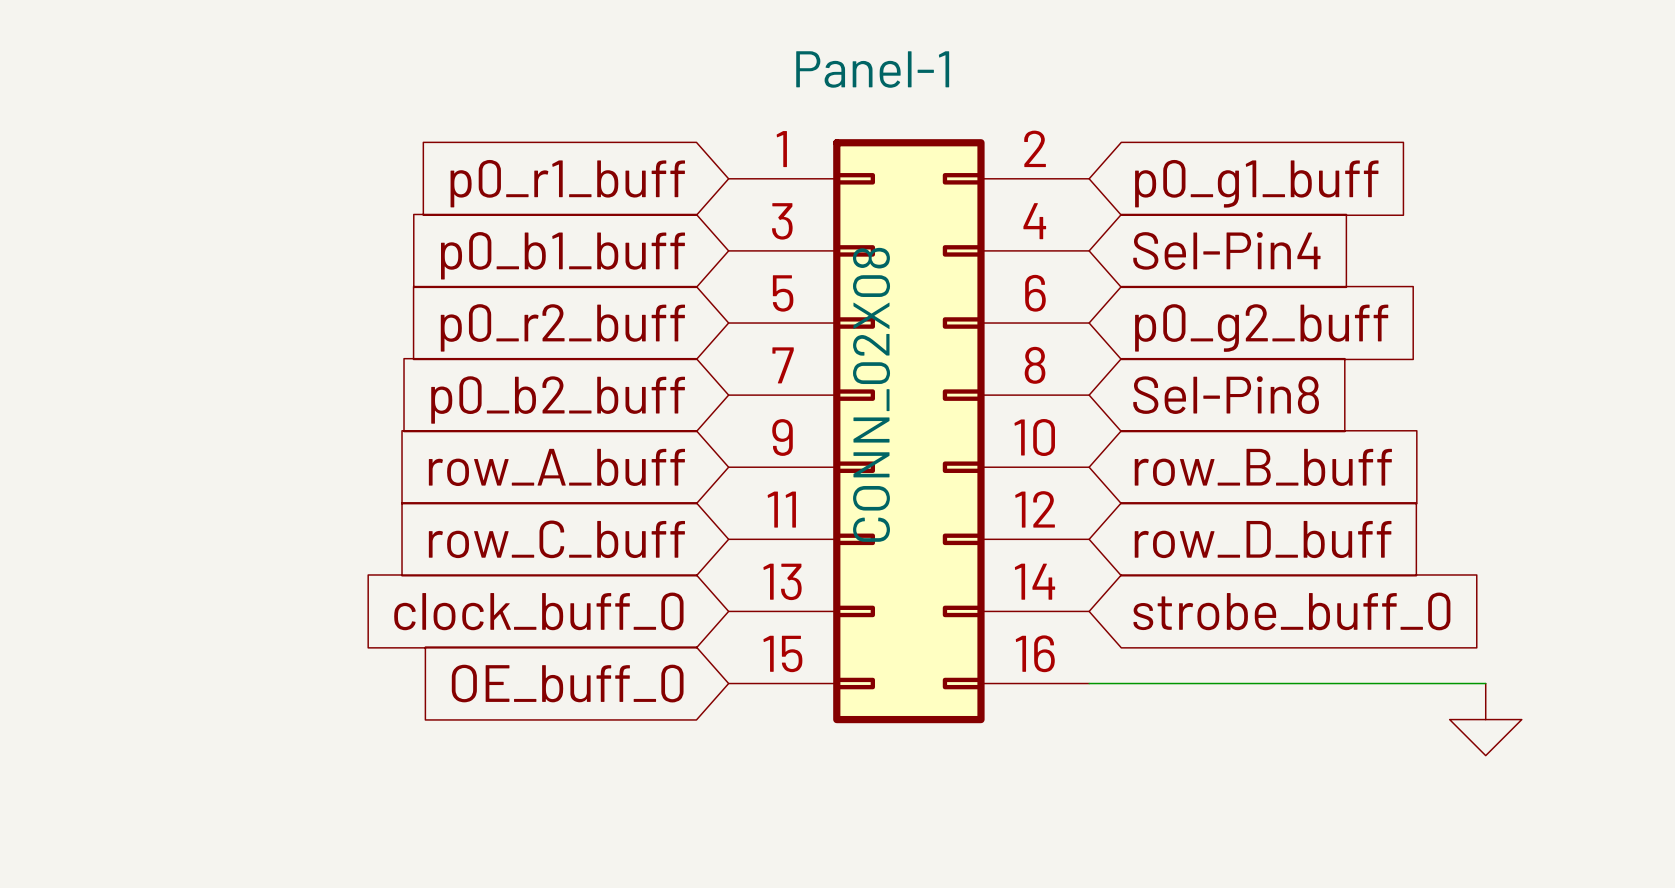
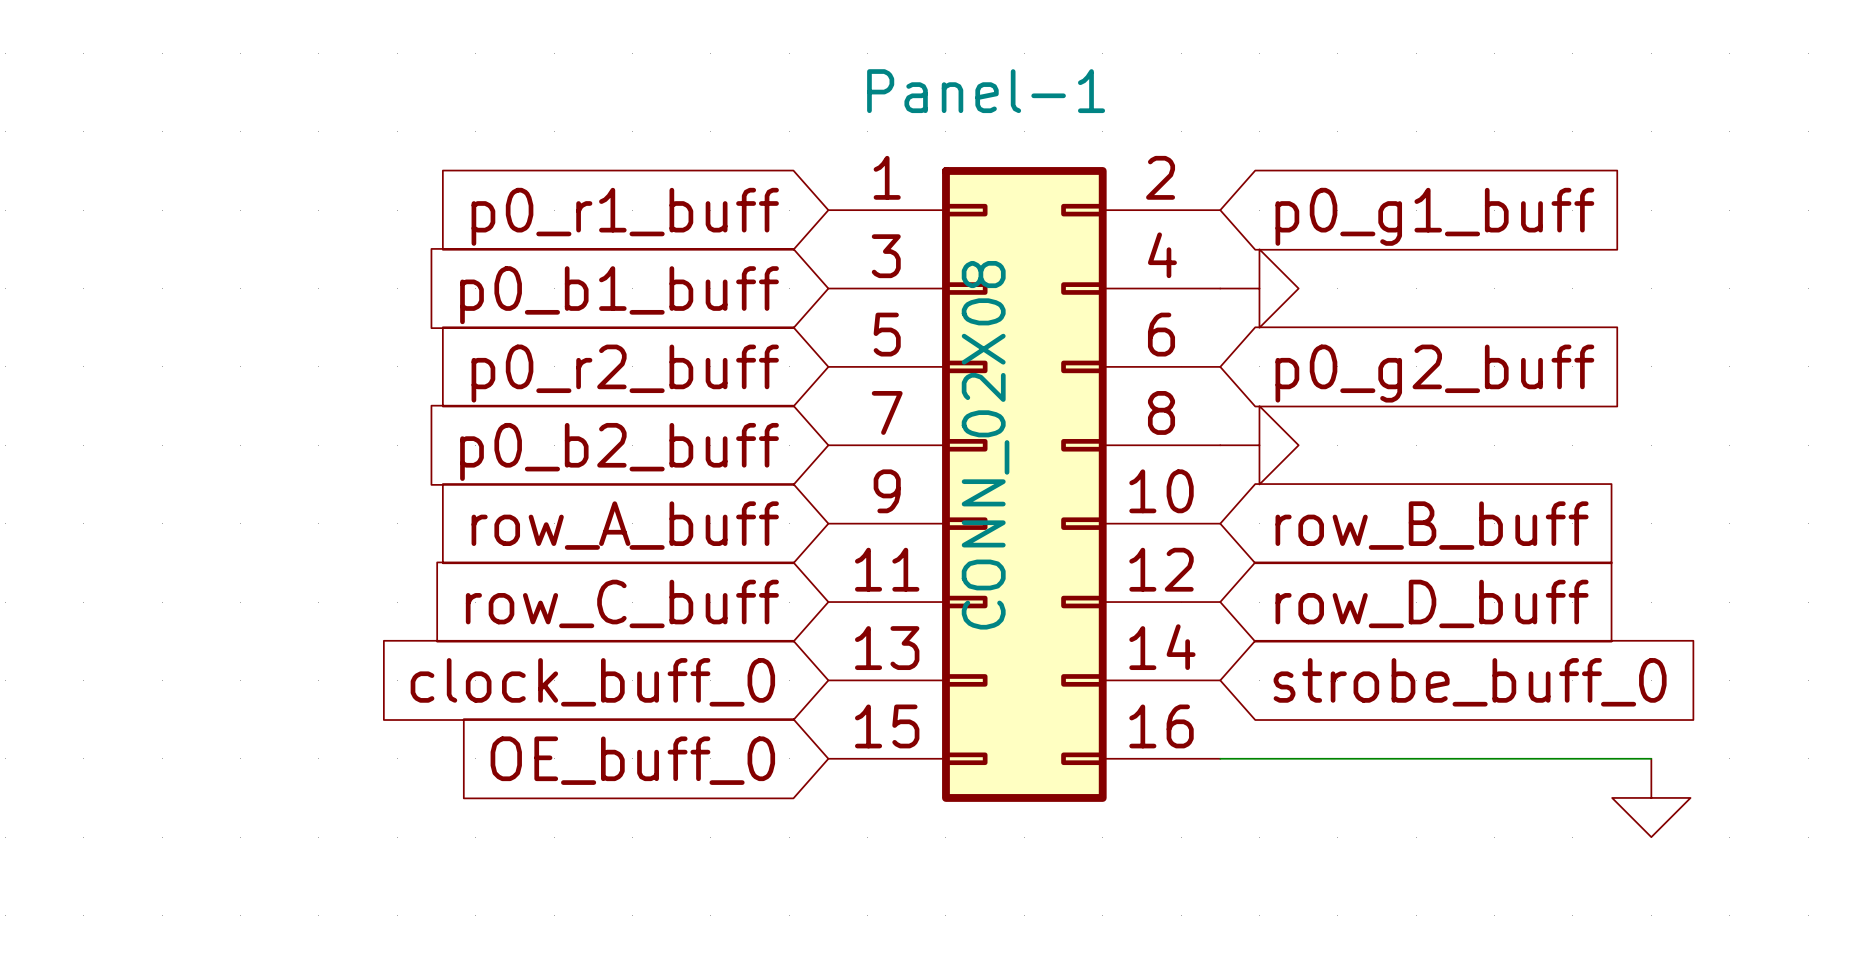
power symbol: none -> (1259, 288)
global label: Sel-Pin4 (1226, 250) -> none
power symbol: none -> (1259, 445)
global label: Sel-Pin8 (1226, 395) -> none

